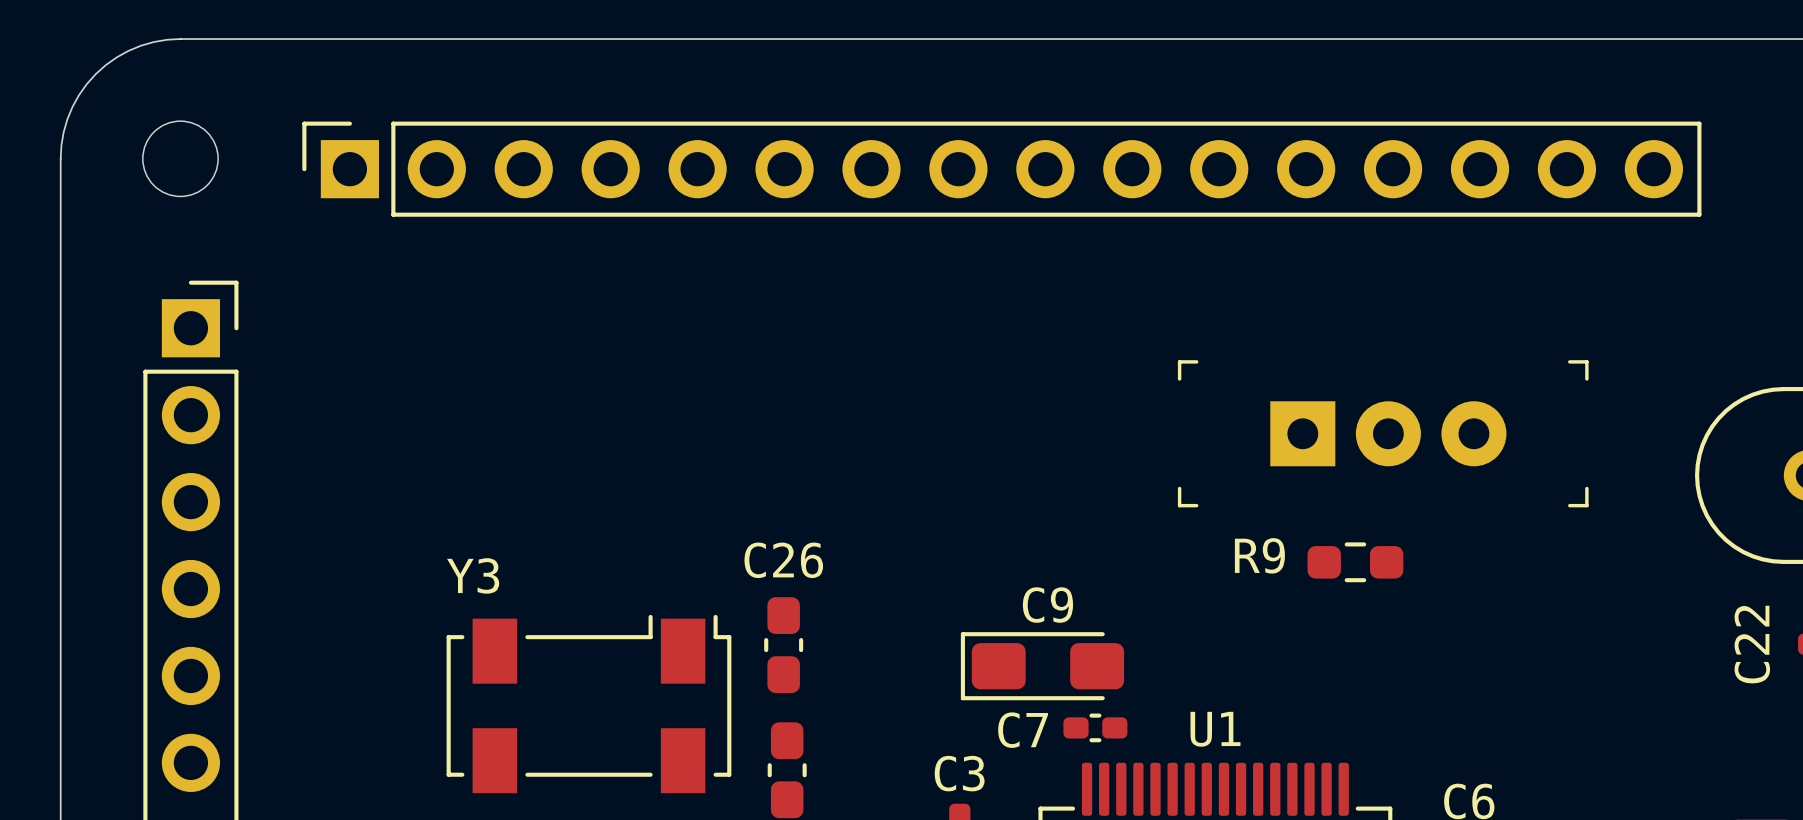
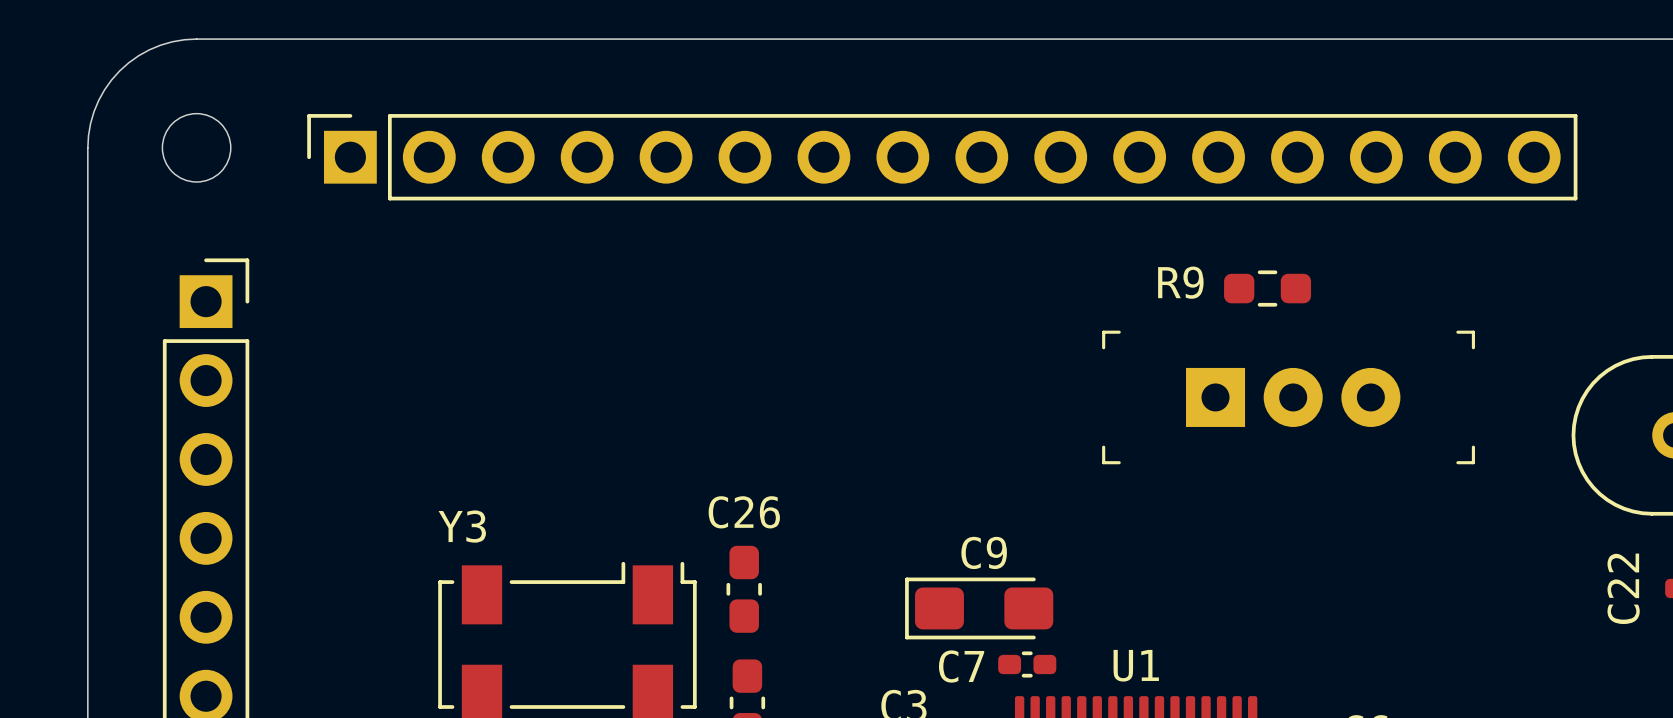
R9 position: (1355, 562) -> (1267, 288)

